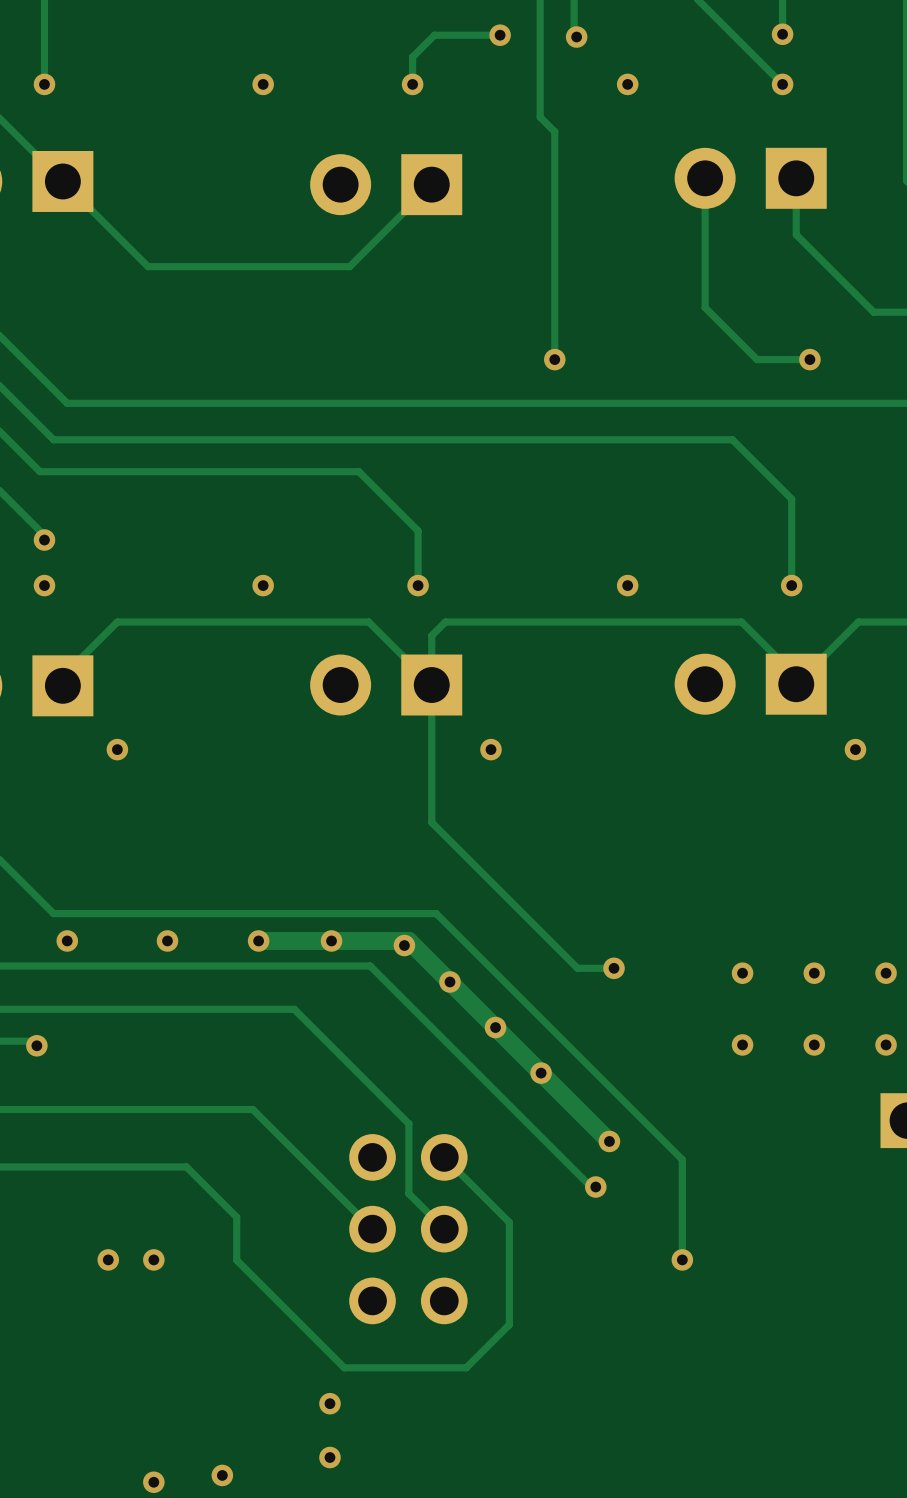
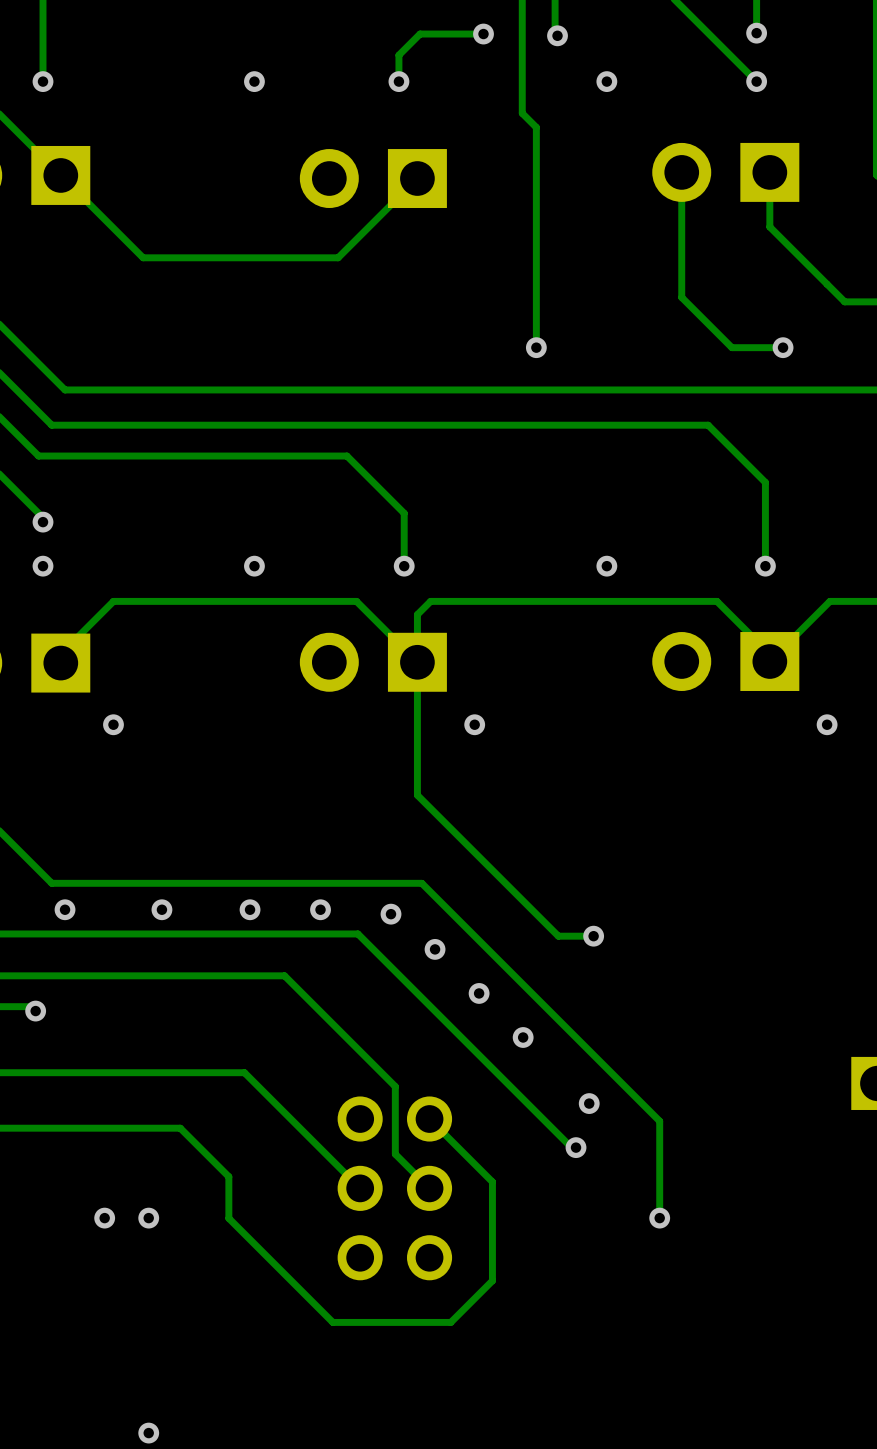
track: (258, 940) (408, 940) (609, 1141) -> none
via: (742, 973) -> none
via: (814, 973) -> none
via: (886, 973) -> none
via: (742, 1044) -> none
via: (814, 1044) -> none
via: (886, 1044) -> none
via: (329, 1403) -> none
via: (329, 1457) -> none
via: (222, 1475) -> none

